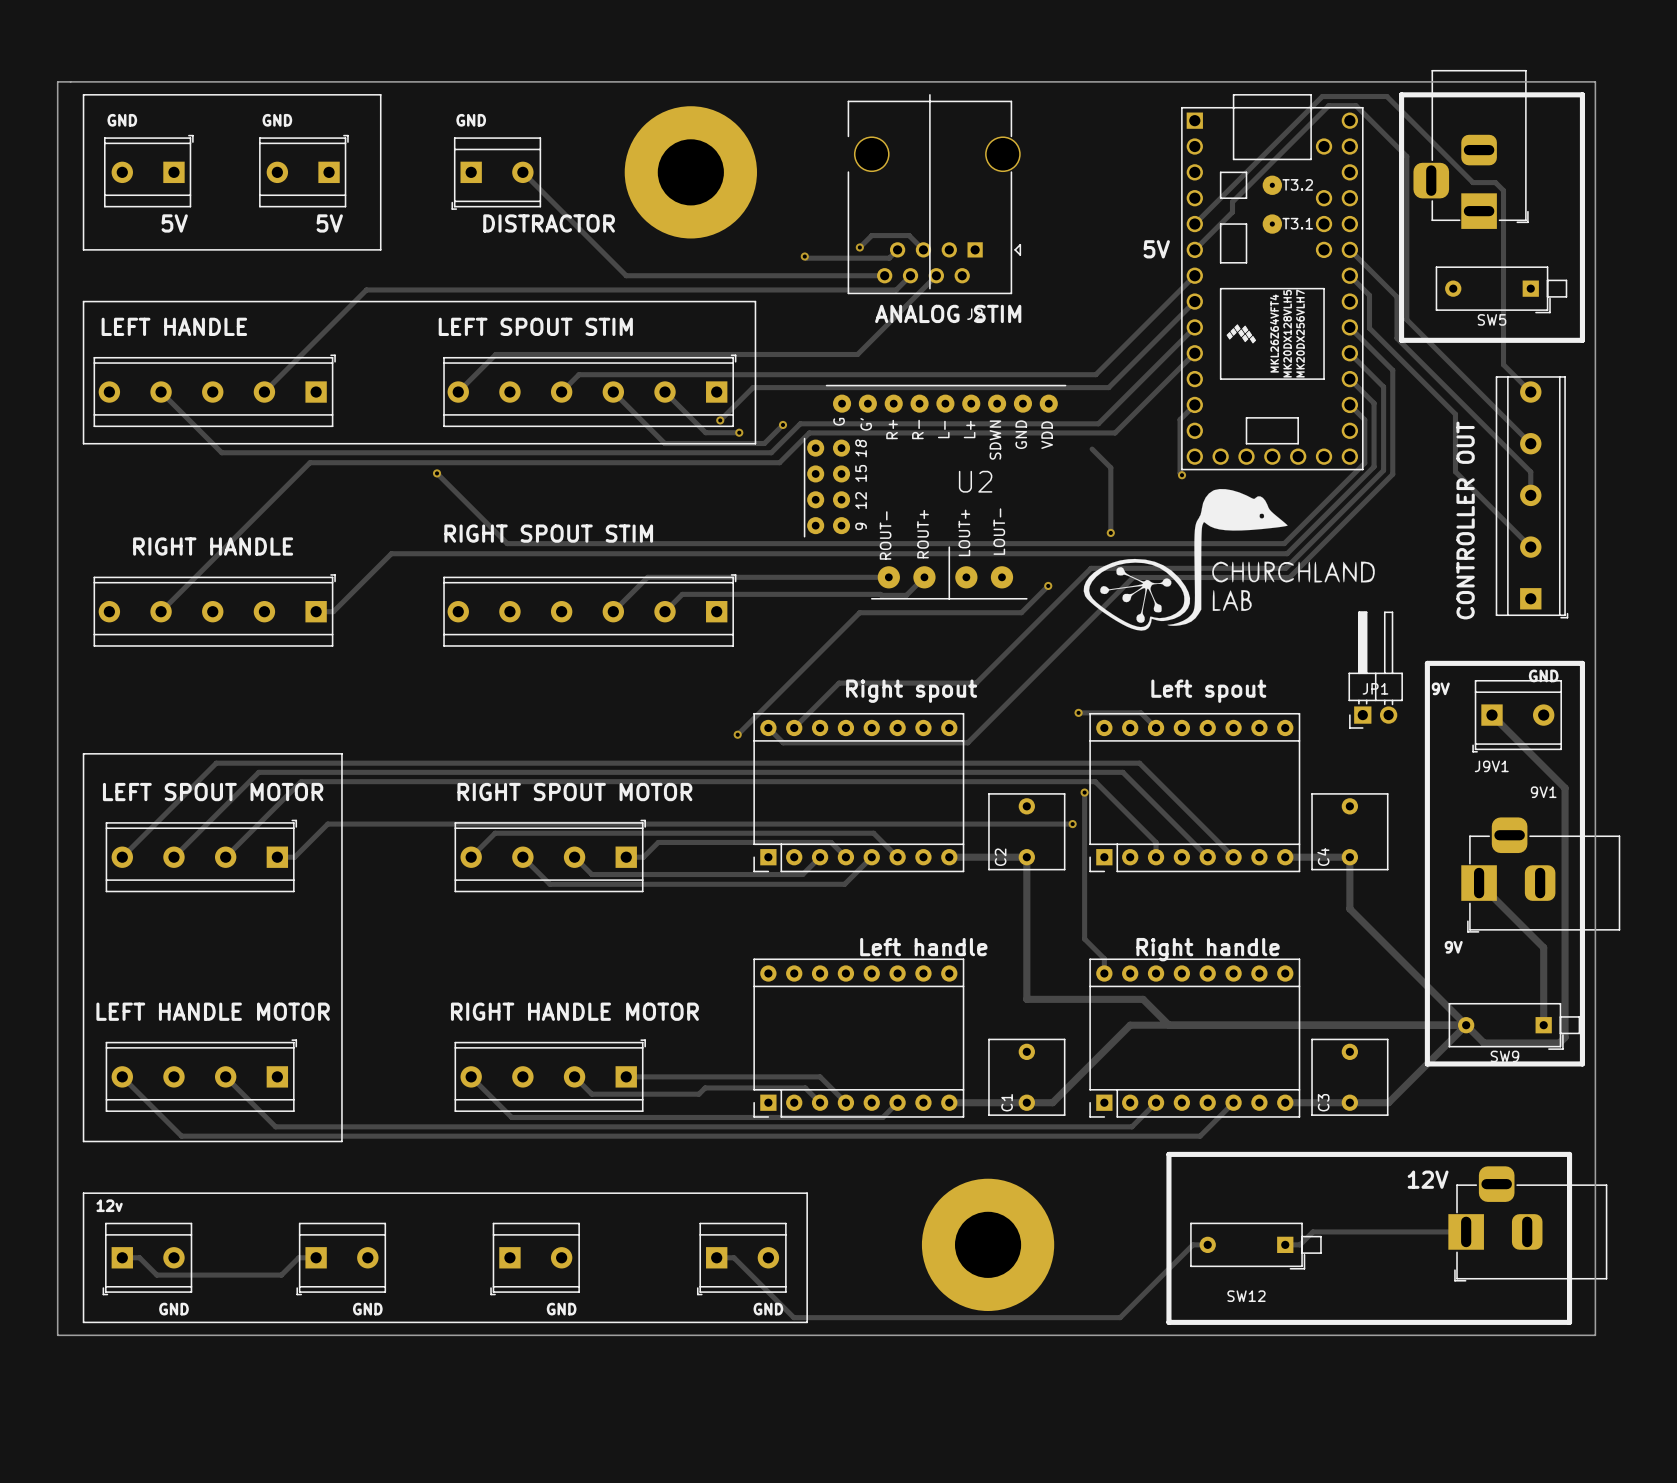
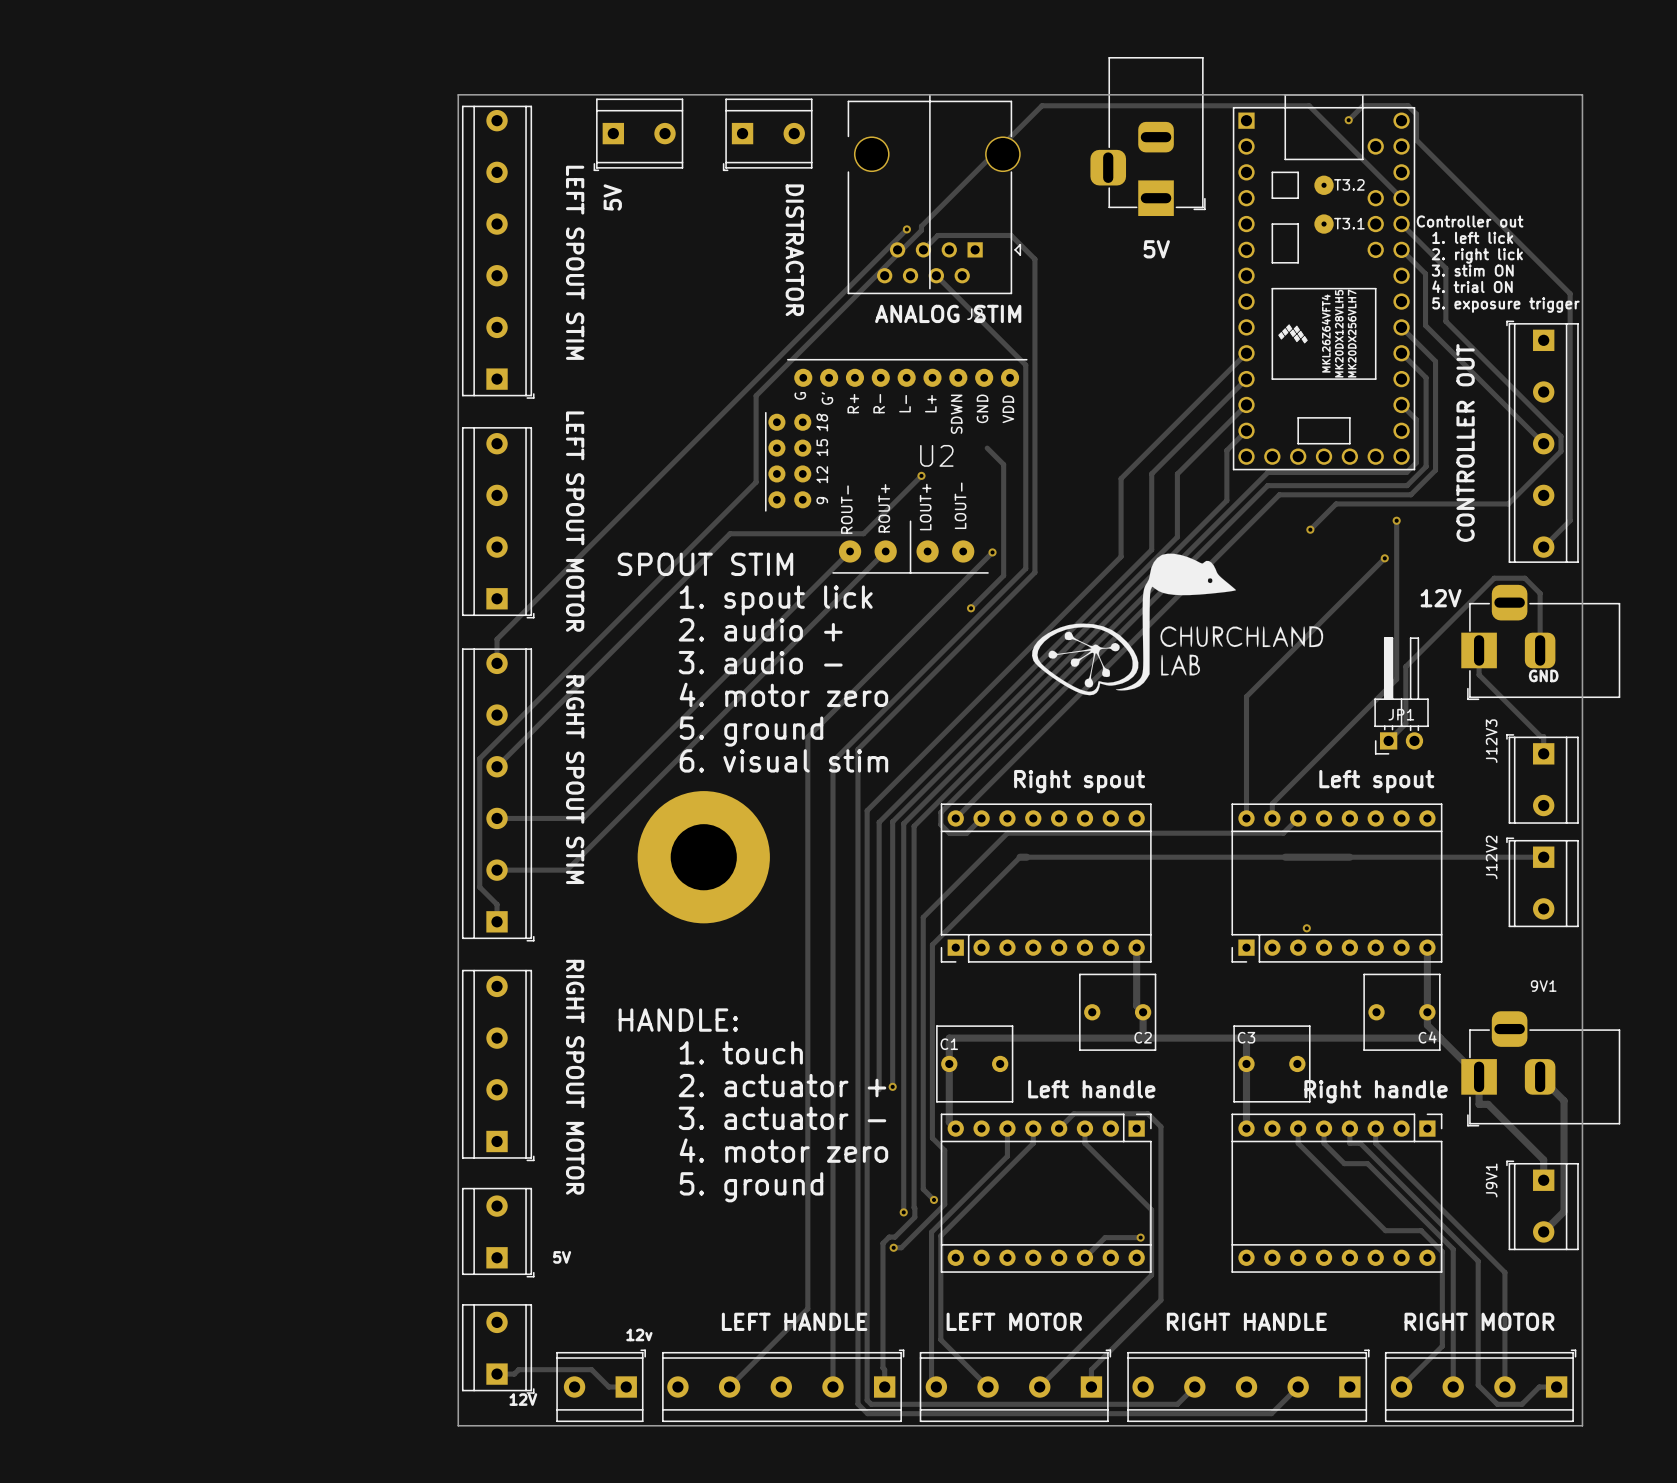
board edge: (57, 81) (1595, 81) (1595, 1335) (57, 1335) (57, 81) -> (458, 94) (458, 1425) (1582, 1425) (1582, 94) (458, 94)
line: (83, 94) (83, 249) (380, 249) (380, 94) (83, 94) -> none
line: (1401, 94) (1582, 94) (1582, 340) (1401, 340) (1401, 94) -> none
text: GND (122, 120) -> none
text: GND (277, 120) -> none
text: GND (471, 120) -> none
track: none -> (1348, 120) (1363, 105) (1408, 105) (1416, 114) (1416, 140) (1570, 293) (1570, 520) (1543, 547)
via: none -> (1348, 120)
part: none -> (638, 134)
part: none -> (767, 134)
part: none -> (1147, 136)
part: (1470, 149) -> none
part: (148, 171) -> none
part: (303, 171) -> none
track: (522, 172) (626, 275) (884, 275) -> none
part: (690, 172) -> none
part: (496, 173) -> none
text: none -> 5V (612, 197)
track: none -> (1401, 198) (1309, 105) (1041, 105) (921, 226) (921, 230) (756, 395) (756, 482) (479, 758) (479, 887) (497, 904) (497, 921)
text: none -> Controller out (1470, 221)
text: 5V (174, 223) -> none
text: 5V (329, 223) -> none
text rotation: 0° (549, 223) -> 90° clockwise (794, 250)
text position: DISTRACTOR (549, 223) -> DISTRACTOR (794, 250)
track: (1194, 224) (1322, 96) (1386, 96) (1473, 182) (1495, 182) (1503, 190) (1503, 364) (1530, 392) -> none
track: none -> (1401, 224) (1445, 268) (1445, 321) (1560, 436) (1560, 451) (1508, 503) (1336, 503) (1310, 529)
track: none -> (906, 229) (497, 639) (497, 663)
text: none -> 1. left lick (1472, 237)
track: (859, 247) (871, 235) (909, 235) (923, 249) -> (1298, 1387) (1271, 1413) (867, 1413) (857, 1404) (857, 749) (1034, 572) (1034, 259) (1011, 235) (937, 235) (923, 249)
via position: (859, 247) -> (906, 229)
track: (897, 249) (889, 258) (806, 258) (804, 256) -> none
track: (1194, 249) (1232, 212) (1232, 202) (1328, 105) (1355, 105) (1406, 156) (1406, 319) (1530, 443) -> none
track: (1349, 249) (1397, 297) (1397, 338) (1530, 472) (1530, 495) -> none
track: none -> (1401, 249) (1425, 273) (1425, 325) (1543, 443)
text: none -> 2. right lick (1477, 255)
via: (804, 256) -> none
text: none -> 3. stim ON (1472, 270)
track: (910, 275) (896, 289) (366, 289) (264, 392) -> none
track: (936, 275) (857, 354) (495, 354) (458, 392) -> (936, 275) (1025, 365) (1025, 568) (832, 761) (832, 1387)
track: (1194, 275) (1095, 374) (578, 374) (561, 392) -> none
track: (1349, 275) (1369, 295) (1369, 328) (1455, 414) (1455, 471) (1530, 547) -> none
part position: (1272, 282) -> (1324, 282)
text: none -> 4. trial ON (1472, 286)
SW5: (1501, 289) -> none
line: (83, 301) (83, 443) (755, 443) (755, 301) (83, 301) -> none
track: (1194, 301) (1108, 387) (753, 387) (720, 420) -> none
text: none -> 5. exposure trigger (1505, 305)
text: LEFT HANDLE (174, 326) -> none
text rotation: 0° (535, 326) -> 90° clockwise (575, 262)
track: (1194, 327) (1098, 423) (800, 423) (771, 452) (221, 452) (161, 392) -> none
track: (1349, 327) (1392, 370) (1392, 474) (1289, 577) (1133, 577) (967, 742) (783, 742) (768, 727) -> none
track: none -> (1401, 327) (1435, 361) (1435, 470) (1410, 494) (1279, 494) (955, 818)
track: (1194, 353) (1115, 432) (809, 432) (779, 462) (310, 462) (161, 611) -> none
track: none -> (1246, 353) (1194, 404)
track: (1349, 353) (1383, 386) (1383, 470) (1285, 568) (1091, 568) (976, 683) (839, 683) (794, 727) -> none
track: none -> (1401, 353) (1426, 377) (1426, 466) (1407, 485) (1267, 485) (940, 812) (940, 824) (949, 833) (966, 833) (981, 818)
track: none -> (1246, 379) (1151, 473) (1151, 549) (879, 822) (879, 1089)
track: (1349, 379) (1374, 403) (1374, 466) (1287, 553) (391, 553) (333, 611) (316, 611) -> none
part: (214, 390) -> none
part rotation: 0° (589, 390) -> 90° clockwise (498, 252)
track: (613, 392) (664, 443) (764, 443) (782, 424) -> none
track: (665, 392) (705, 432) (739, 432) -> none
track: none -> (1246, 404) (1177, 474) (1177, 537) (892, 821) (892, 1086)
track: (1349, 404) (1364, 419) (1364, 463) (1284, 543) (507, 543) (437, 473) -> none
track: none -> (1401, 404) (1416, 419) (1416, 462) (1406, 472) (1267, 472) (914, 826) (914, 1217) (894, 1237) (889, 1237) (882, 1243) (884, 1387)
track: (1180, 419) (1180, 473) (1182, 475) -> (1180, 419) (1121, 478) (1121, 556) (867, 810) (867, 1400) (871, 1404) (1177, 1404) (1194, 1387)
via: (720, 420) -> none
via: (782, 424) -> none
track: none -> (1246, 430) (1226, 450) (1226, 500) (903, 823) (903, 1212)
via: (739, 432) -> none
track: none -> (987, 448) (1003, 464) (1003, 575) (971, 608)
track: (1092, 449) (1110, 467) (1110, 532) -> none
via: (437, 473) -> none
track: none -> (921, 475) (863, 533) (730, 533) (497, 766)
via: none -> (921, 475)
via: (1182, 475) -> none
U2 position: (935, 492) -> (896, 466)
part rotation: 0° (1531, 497) -> 180° (1542, 441)
track: none -> (1396, 520) (1396, 679) (1272, 803) (1272, 818)
via: none -> (1396, 520)
text position: CONTROLLER OUT (1465, 520) -> CONTROLLER OUT (1465, 442)
text: none -> LEFT SPOUT MOTOR (575, 521)
part: none -> (498, 522)
via: none -> (1310, 529)
via: (1110, 532) -> none
text rotation: 0° (548, 533) -> 90° clockwise (575, 779)
text: RIGHT HANDLE (213, 546) -> none
track: none -> (850, 551) (583, 818) (497, 818)
track: none -> (885, 551) (567, 870) (497, 870)
track: none -> (992, 552) (807, 737) (807, 1308) (729, 1387)
via: none -> (992, 552)
track: none -> (1384, 558) (1246, 696) (1246, 818)
via: none -> (1384, 558)
drawing position: (1229, 559) -> (1177, 624)
text: none -> SPOUT STIM (705, 564)
track: (888, 577) (647, 577) (613, 611) -> none
track: (924, 577) (906, 595) (682, 594) (665, 611) -> none
track: (1048, 585) (1021, 612) (859, 612) (737, 734) -> none
via: (1048, 585) -> none
text: none -> 12V (1441, 598)
text: none -> 1. spout lick (776, 600)
via: none -> (971, 608)
part: (214, 610) -> none
part: (589, 610) -> none
text: none -> 2. audio + (760, 629)
part: none -> (1540, 642)
track: none -> (1479, 650) (1479, 674) (1540, 736) (1543, 736) (1543, 753)
track: none -> (1540, 650) (1540, 593) (1524, 578) (1494, 578) (1405, 666) (1405, 723) (1388, 740)
text: none -> 3. audio - (760, 662)
line: (1427, 663) (1582, 663) (1582, 1063) (1427, 1063) (1427, 663) -> none
JP1 position: (1375, 670) -> (1401, 695)
text: 9V (1440, 688) -> none
text position: Right spout (911, 691) -> Right spout (1079, 781)
text position: Left spout (1208, 691) -> Left spout (1376, 781)
text: none -> 4. motor zero (783, 694)
track: (1078, 712) (1140, 712) (1156, 727) -> none
via: (1078, 712) -> none
track: (1492, 715) (1565, 788) (1565, 1037) (1559, 1043) (1483, 1043) (1349, 908) (1349, 857) -> (1543, 857) (1349, 857)
J9V1 rotation: 0° (1517, 716) -> 90° clockwise (1542, 1205)
J9V1 position: (1517, 716) -> (1542, 1205)
text: none -> 5. ground (751, 731)
via: (737, 734) -> none
line: (83, 753) (83, 1141) (341, 1141) (341, 753) (83, 753) -> none
text: none -> 6. visual stim (783, 760)
J12V3: none -> (1542, 778)
text: LEFT SPOUT MOTOR (213, 792) -> none
text: RIGHT SPOUT MOTOR (574, 792) -> none
part: (858, 792) -> none
track: (1084, 792) (1084, 939) (1104, 958) (1104, 973) -> none
via: (1084, 792) -> none
part: (1194, 792) -> none
part: none -> (498, 794)
track: none -> (1298, 818) (1283, 833) (1007, 833) (923, 917) (923, 1189) (934, 1199)
track: (1072, 824) (327, 824) (294, 857) (277, 857) -> none
via: (1072, 824) -> none
C2 rotation: 0° (1026, 831) -> 90° clockwise (1117, 1012)
C2 position: (1026, 831) -> (1117, 1012)
C4 rotation: 0° (1349, 831) -> 90° clockwise (1401, 1012)
C4 position: (1349, 831) -> (1401, 1012)
part: (201, 855) -> none
part: (550, 855) -> none
C4 name position: C4 (1323, 856) -> C4 (1427, 1037)
track: (122, 857) (216, 763) (1139, 763) (1233, 857) -> none
track: (173, 857) (258, 772) (1122, 772) (1207, 857) -> none
track: (225, 857) (301, 781) (1095, 781) (1156, 842) (1156, 857) -> none
track: (471, 857) (495, 833) (873, 833) (897, 857) -> none
track: (522, 857) (549, 884) (844, 884) (871, 857) -> none
track: (574, 857) (591, 874) (802, 874) (820, 857) -> none
track: (626, 857) (643, 857) (658, 842) (831, 842) (845, 857) -> none
part: none -> (703, 857)
track: (949, 857) (1020, 857) -> (893, 1247) (901, 1247) (944, 1204) (944, 1150) (932, 1138) (932, 944) (1020, 857)
C2 name position: C2 (1000, 857) -> C2 (1143, 1037)
track: (1026, 857) (1026, 999) (1143, 999) (1168, 1025) -> (1026, 857) (1285, 857)
9V1 position: (1540, 874) -> (1540, 1068)
J12V2: none -> (1542, 882)
part: none -> (1046, 883)
part: none -> (1336, 883)
track: (1479, 883) (1543, 947) (1543, 1025) -> none
via: none -> (1306, 928)
text position: Left handle (923, 947) -> Left handle (1091, 1089)
track: none -> (1136, 947) (1136, 1005) (1143, 1012) (1143, 1038)
track: none -> (1427, 947) (1427, 1025) (1479, 1076) (1479, 1104) (1488, 1104) (1543, 1159) (1543, 1180)
text: 9V (1453, 947) -> none
text position: Right handle (1208, 949) -> Right handle (1376, 1091)
text: LEFT HANDLE MOTOR (213, 1011) -> none
text: RIGHT HANDLE MOTOR (574, 1011) -> RIGHT SPOUT MOTOR (575, 1077)
text: none -> HANDLE: (678, 1020)
SW9: (1514, 1026) -> none
part: (858, 1038) -> none
part: (1194, 1038) -> none
track: none -> (1246, 1038) (1246, 1128)
track: none -> (1440, 1038) (949, 1038) (949, 1122) (955, 1128)
text: none -> 1. touch (741, 1052)
part: (201, 1075) -> none
part rotation: 0° (550, 1075) -> 90° clockwise (498, 1065)
track: (122, 1076) (181, 1136) (1200, 1136) (1233, 1102) -> none
track: (225, 1076) (275, 1126) (1131, 1126) (1156, 1102) -> none
track: (471, 1076) (511, 1117) (882, 1117) (897, 1102) -> none
track: (574, 1076) (591, 1094) (698, 1094) (705, 1087) (805, 1087) (820, 1102) -> none
track: (626, 1076) (820, 1076) (845, 1102) -> none
track: none -> (1540, 1076) (1564, 1100) (1564, 1211) (1543, 1231)
C1 rotation: 0° (1026, 1077) -> 90° clockwise (974, 1063)
C1 position: (1026, 1077) -> (974, 1063)
C3 rotation: 0° (1349, 1077) -> 90° clockwise (1271, 1063)
C3 position: (1349, 1077) -> (1271, 1063)
text: none -> 2. actuator + (782, 1085)
via: none -> (892, 1086)
track: (949, 1102) (1052, 1102) (1130, 1025) (1466, 1025) (1388, 1102) (1285, 1102) -> none
text: none -> 3. actuator - (782, 1118)
track: none -> (1007, 1128) (1007, 1156) (931, 1232) (931, 1382) (936, 1387)
track: none -> (1033, 1128) (1033, 1143) (940, 1235) (940, 1339) (988, 1387)
track: none -> (1059, 1128) (1073, 1113) (1147, 1113) (1160, 1126) (1160, 1300) (1091, 1369) (1091, 1387)
track: none -> (1084, 1128) (1084, 1143) (1151, 1209) (1151, 1275) (1039, 1387)
track: none -> (1298, 1128) (1298, 1143) (1385, 1230) (1421, 1230) (1442, 1251) (1442, 1346) (1401, 1387)
track: none -> (1324, 1128) (1324, 1143) (1344, 1163) (1367, 1163) (1453, 1249) (1453, 1387)
track: none -> (1349, 1128) (1349, 1143) (1360, 1143) (1478, 1261) (1478, 1385) (1497, 1404) (1522, 1404) (1539, 1387) (1556, 1387)
track: none -> (1375, 1128) (1375, 1143) (1504, 1272) (1504, 1387)
text: none -> 4. motor zero (783, 1150)
line: (1168, 1154) (1168, 1322) (1569, 1322) (1569, 1154) (1168, 1154) -> none
text: 12V (1428, 1179) -> none
text: none -> 5. ground (751, 1187)
line: (83, 1193) (83, 1322) (807, 1322) (807, 1193) (83, 1193) -> none
part: none -> (1046, 1193)
part: none -> (1336, 1193)
via: none -> (934, 1199)
text: 12v (109, 1205) -> none
via: none -> (903, 1212)
part: (1527, 1223) -> none
track: (1466, 1231) (1312, 1231) (1300, 1244) (1285, 1244) -> none
track: none -> (1140, 1237) (1105, 1237) (1084, 1257)
via: none -> (1140, 1237)
part: (988, 1244) -> none
track: (1207, 1244) (1192, 1244) (1120, 1317) (793, 1317) (734, 1257) (716, 1257) -> none
SW12: (1255, 1246) -> none
via: none -> (893, 1247)
track: (122, 1257) (139, 1257) (156, 1275) (281, 1275) (298, 1257) (316, 1257) -> none
text: none -> 5V (562, 1257)
part: (147, 1259) -> none
part: (341, 1259) -> none
part rotation: 0° (535, 1259) -> 90° counterclockwise (498, 1232)
part: (741, 1259) -> none
text: GND (173, 1309) -> none
text: GND (367, 1309) -> none
text: GND (561, 1309) -> none
text: GND (768, 1309) -> none
text: none -> LEFT HANDLE (794, 1321)
text: none -> LEFT MOTOR (1014, 1321)
text: none -> RIGHT HANDLE (1246, 1321)
text: none -> RIGHT MOTOR (1479, 1321)
text: none -> 12v (639, 1334)
part: none -> (498, 1348)
track: none -> (497, 1374) (514, 1374) (518, 1369) (591, 1369) (608, 1387) (626, 1387)
part: none -> (601, 1385)
part: none -> (783, 1385)
part: none -> (1015, 1385)
part: none -> (1248, 1385)
part: none -> (1480, 1385)
text: none -> 12V (523, 1399)

